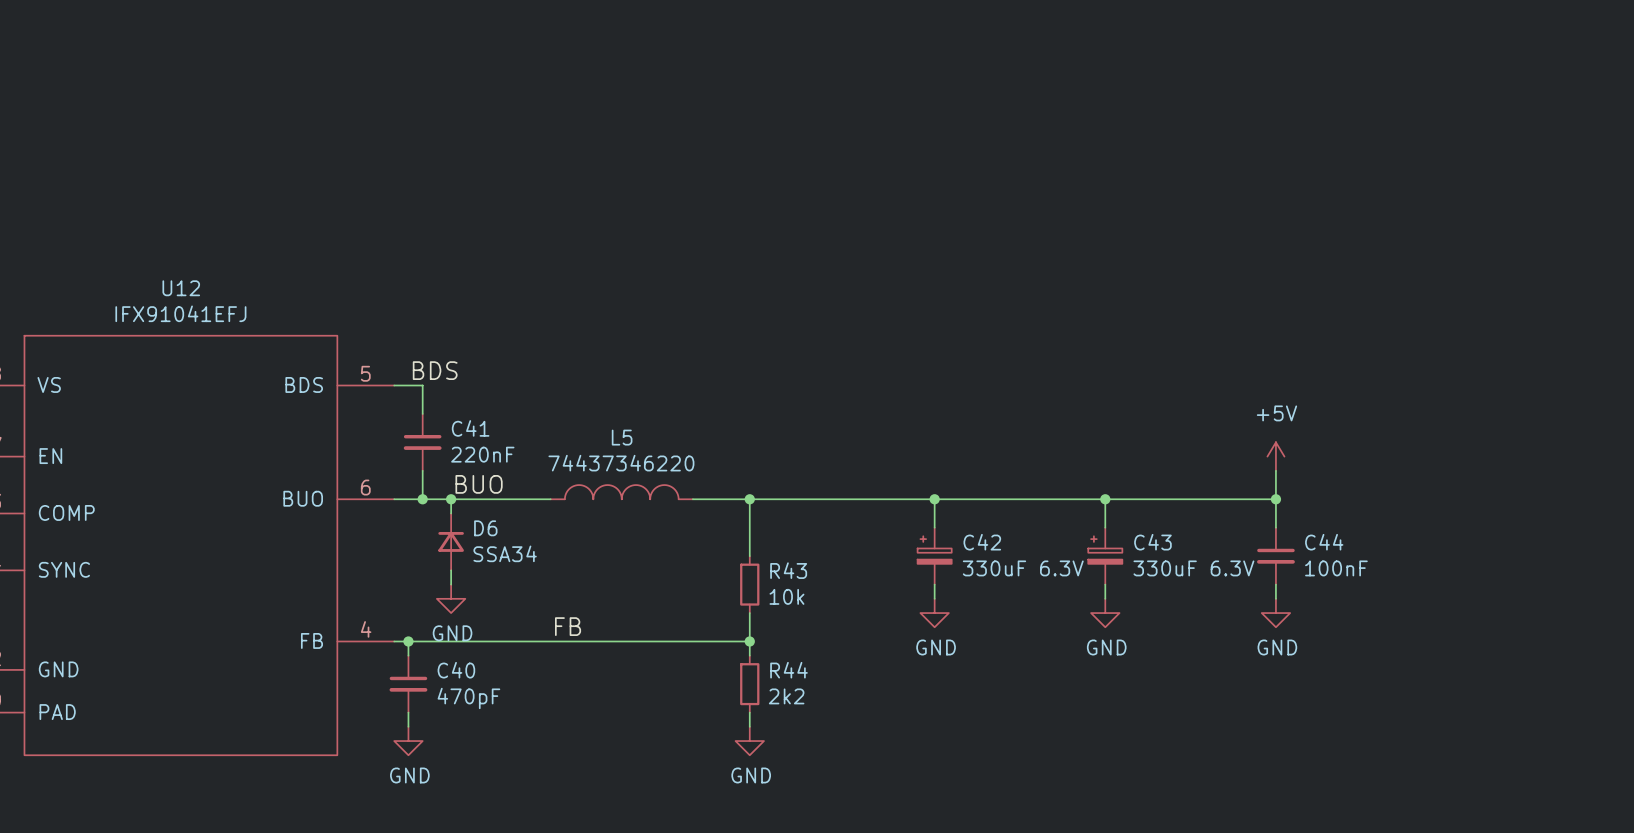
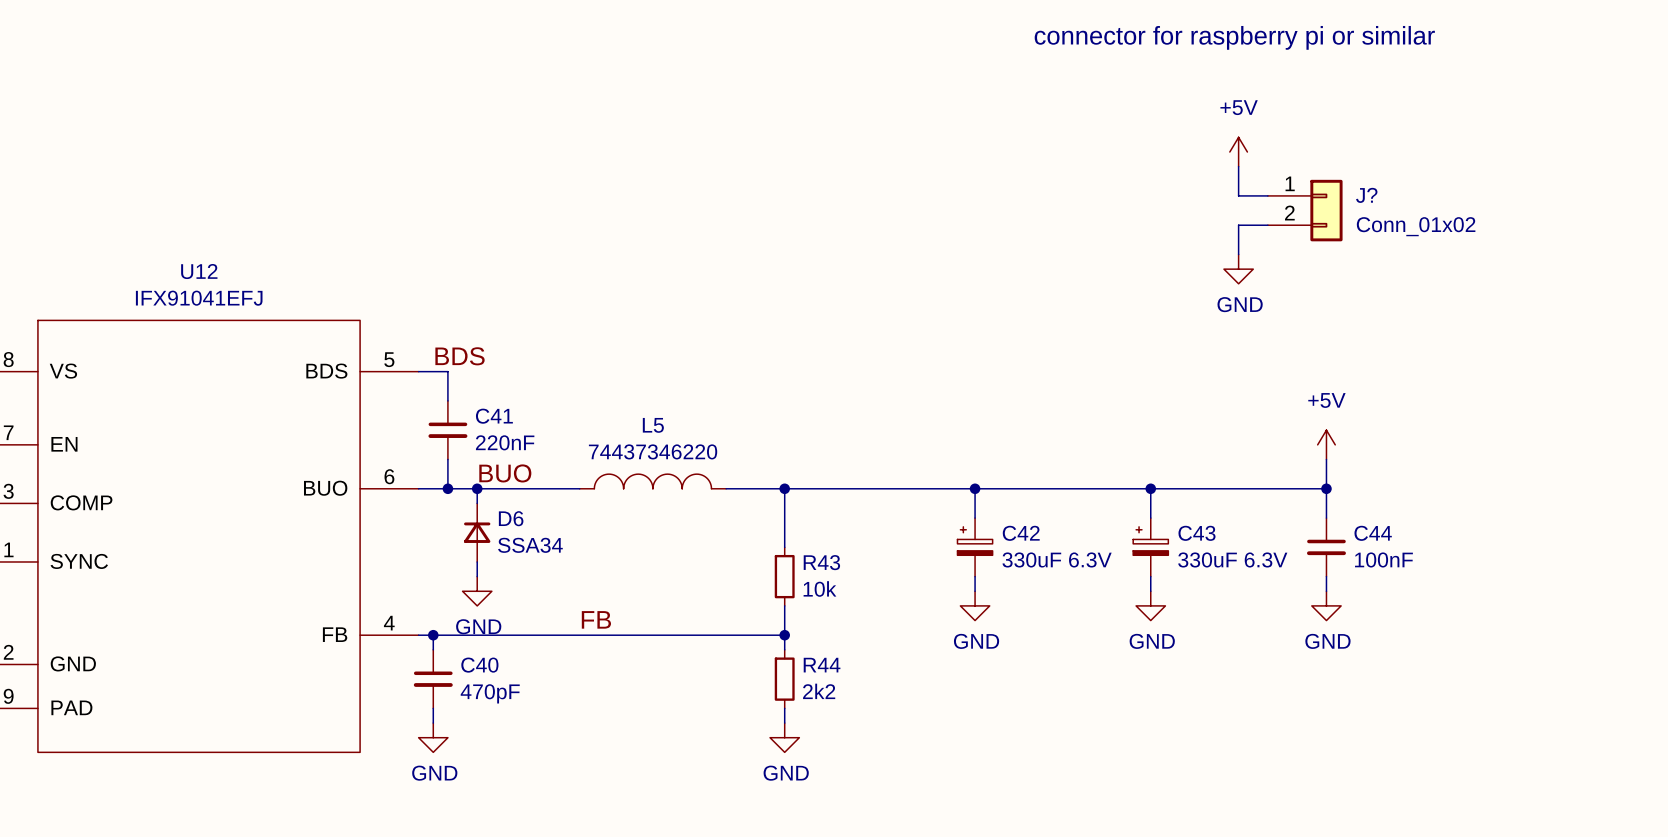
text: none -> connector for raspberry pi or similar (1234, 37)
power symbol: none -> +5V (1238, 152)
wire: none -> (1238, 166) (1238, 195) (1267, 195)
J?: none -> Conn_01x02 (1305, 210)
wire: none -> (1267, 225) (1238, 225) (1238, 254)
power symbol: none -> GND (1238, 269)

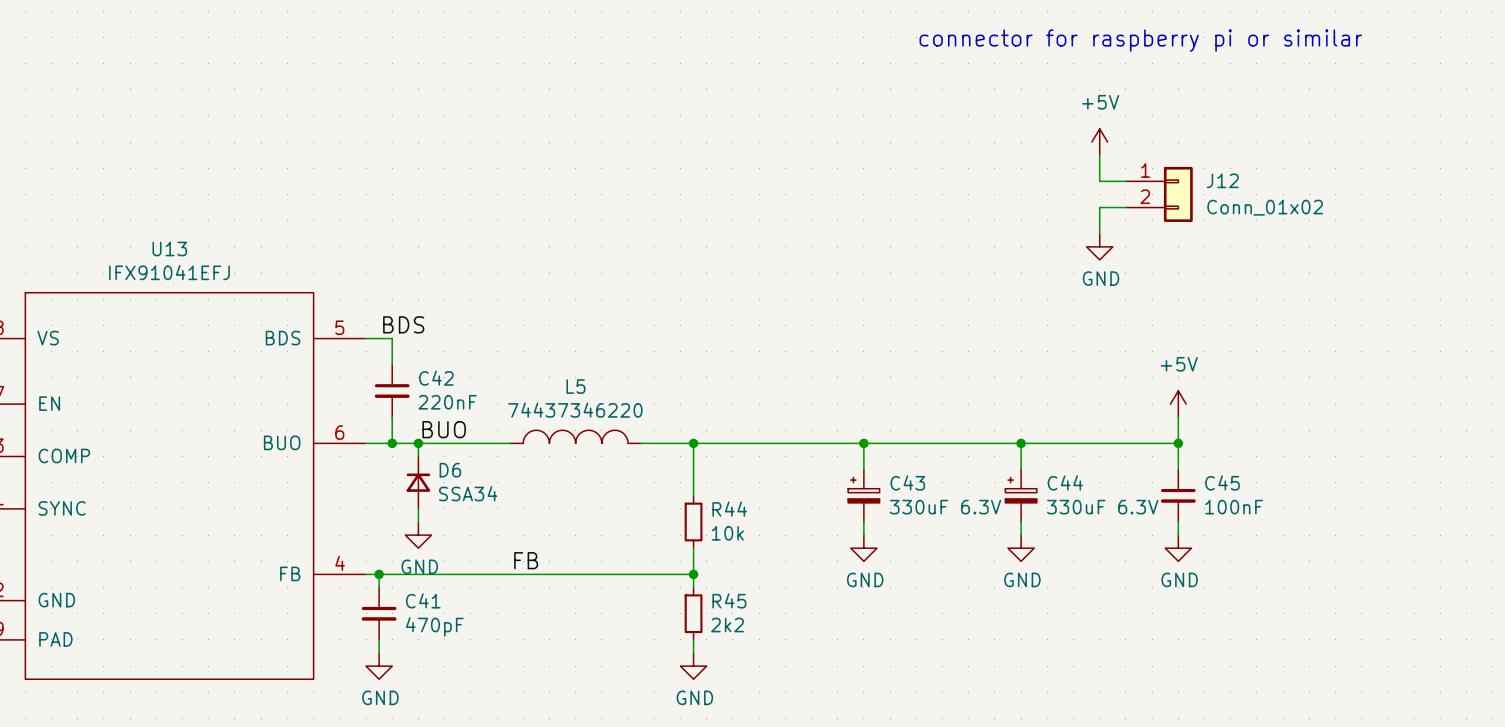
J? name: J? (1366, 195) -> J12 (1222, 180)
U12 name: U12 (199, 271) -> U13 (169, 248)
C41 name: C41 (494, 416) -> C42 (436, 378)
C42 name: C42 (1021, 533) -> C43 (907, 482)
C43 name: C43 (1197, 533) -> C44 (1065, 482)
C44 name: C44 (1373, 533) -> C45 (1222, 482)
R43 name: R43 (821, 562) -> R44 (729, 509)
C40 name: C40 (479, 665) -> C41 (423, 600)
R44 name: R44 (822, 665) -> R45 (729, 600)

